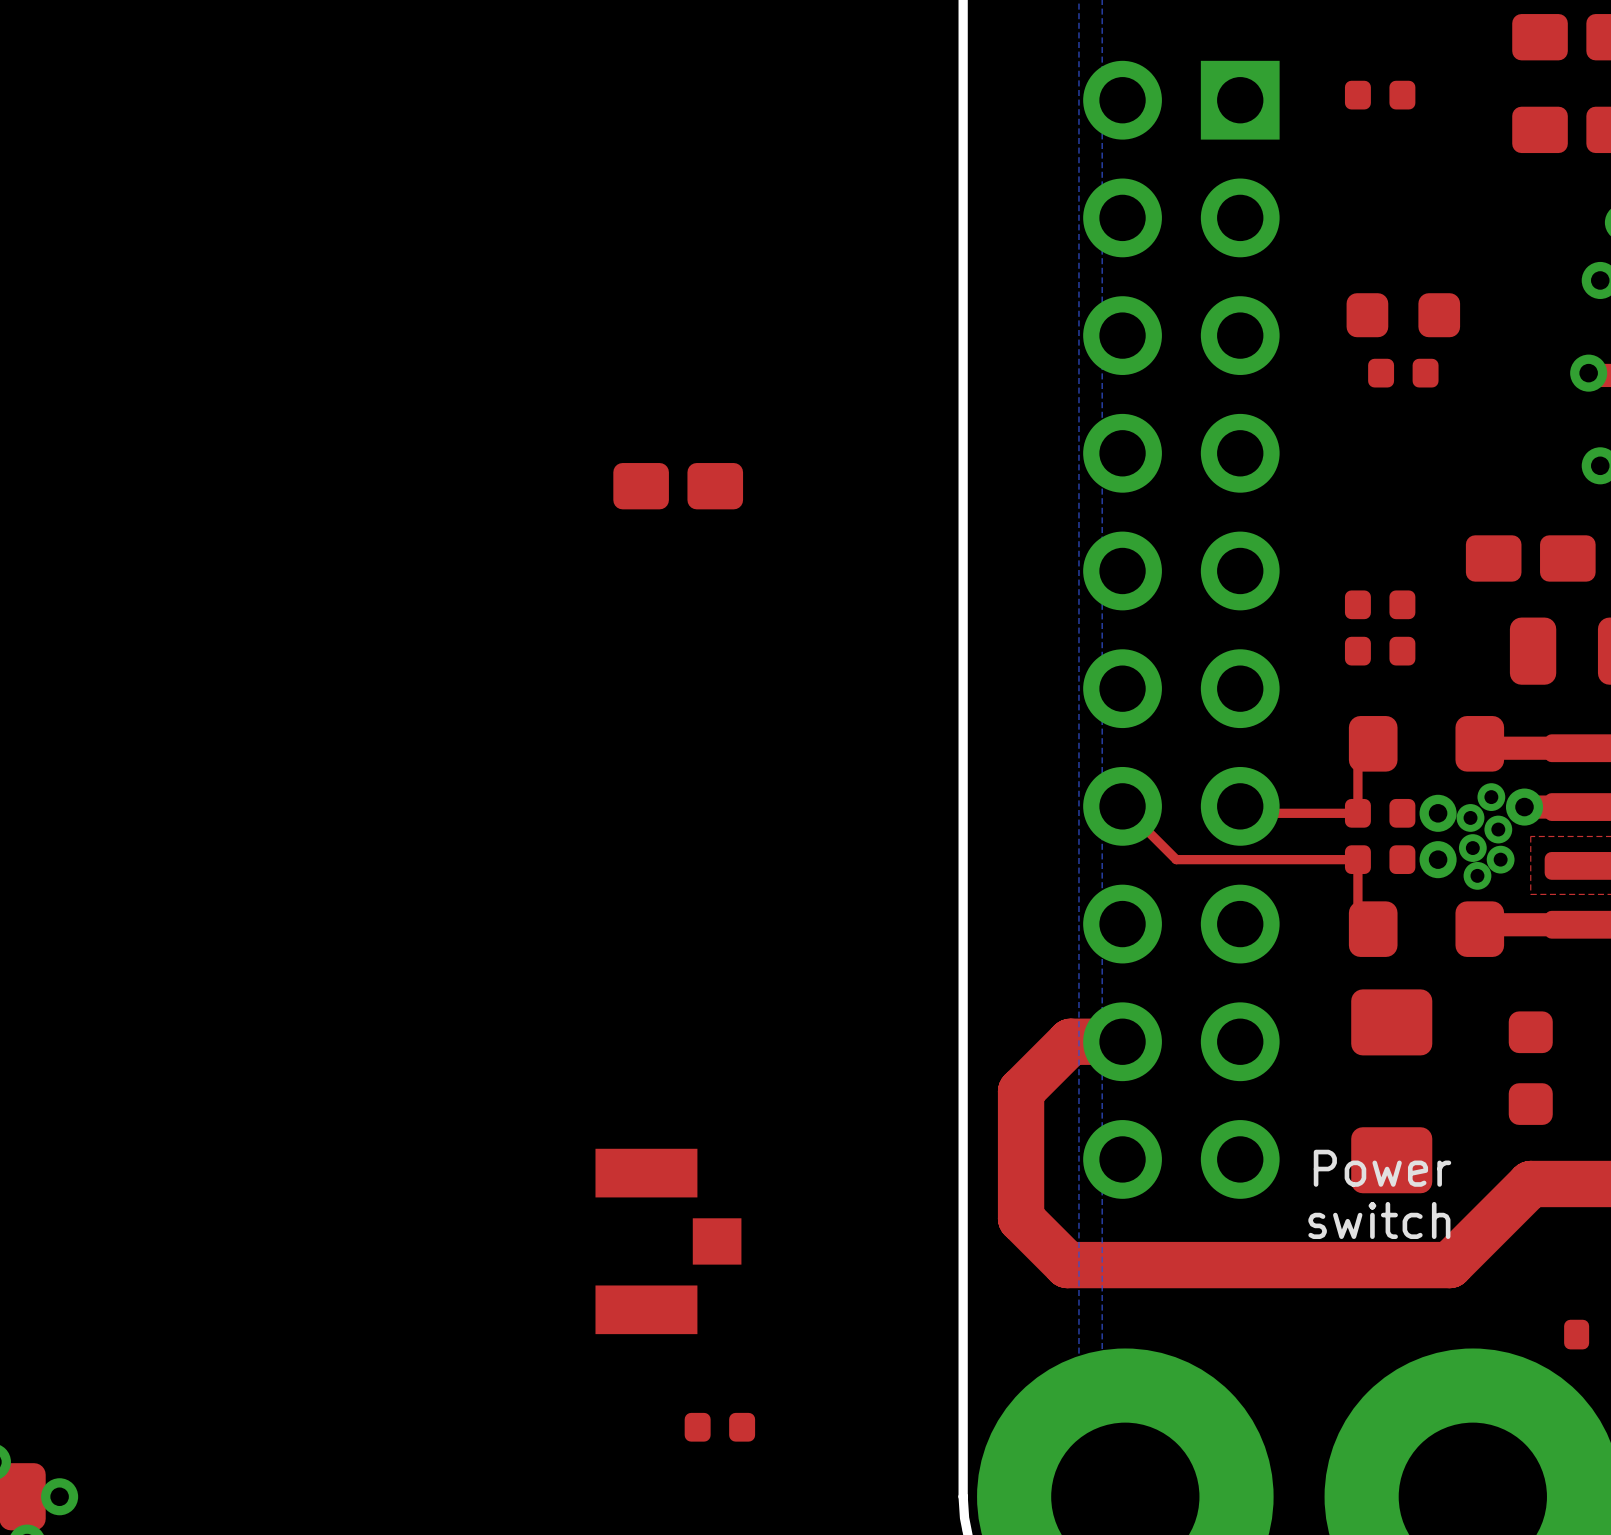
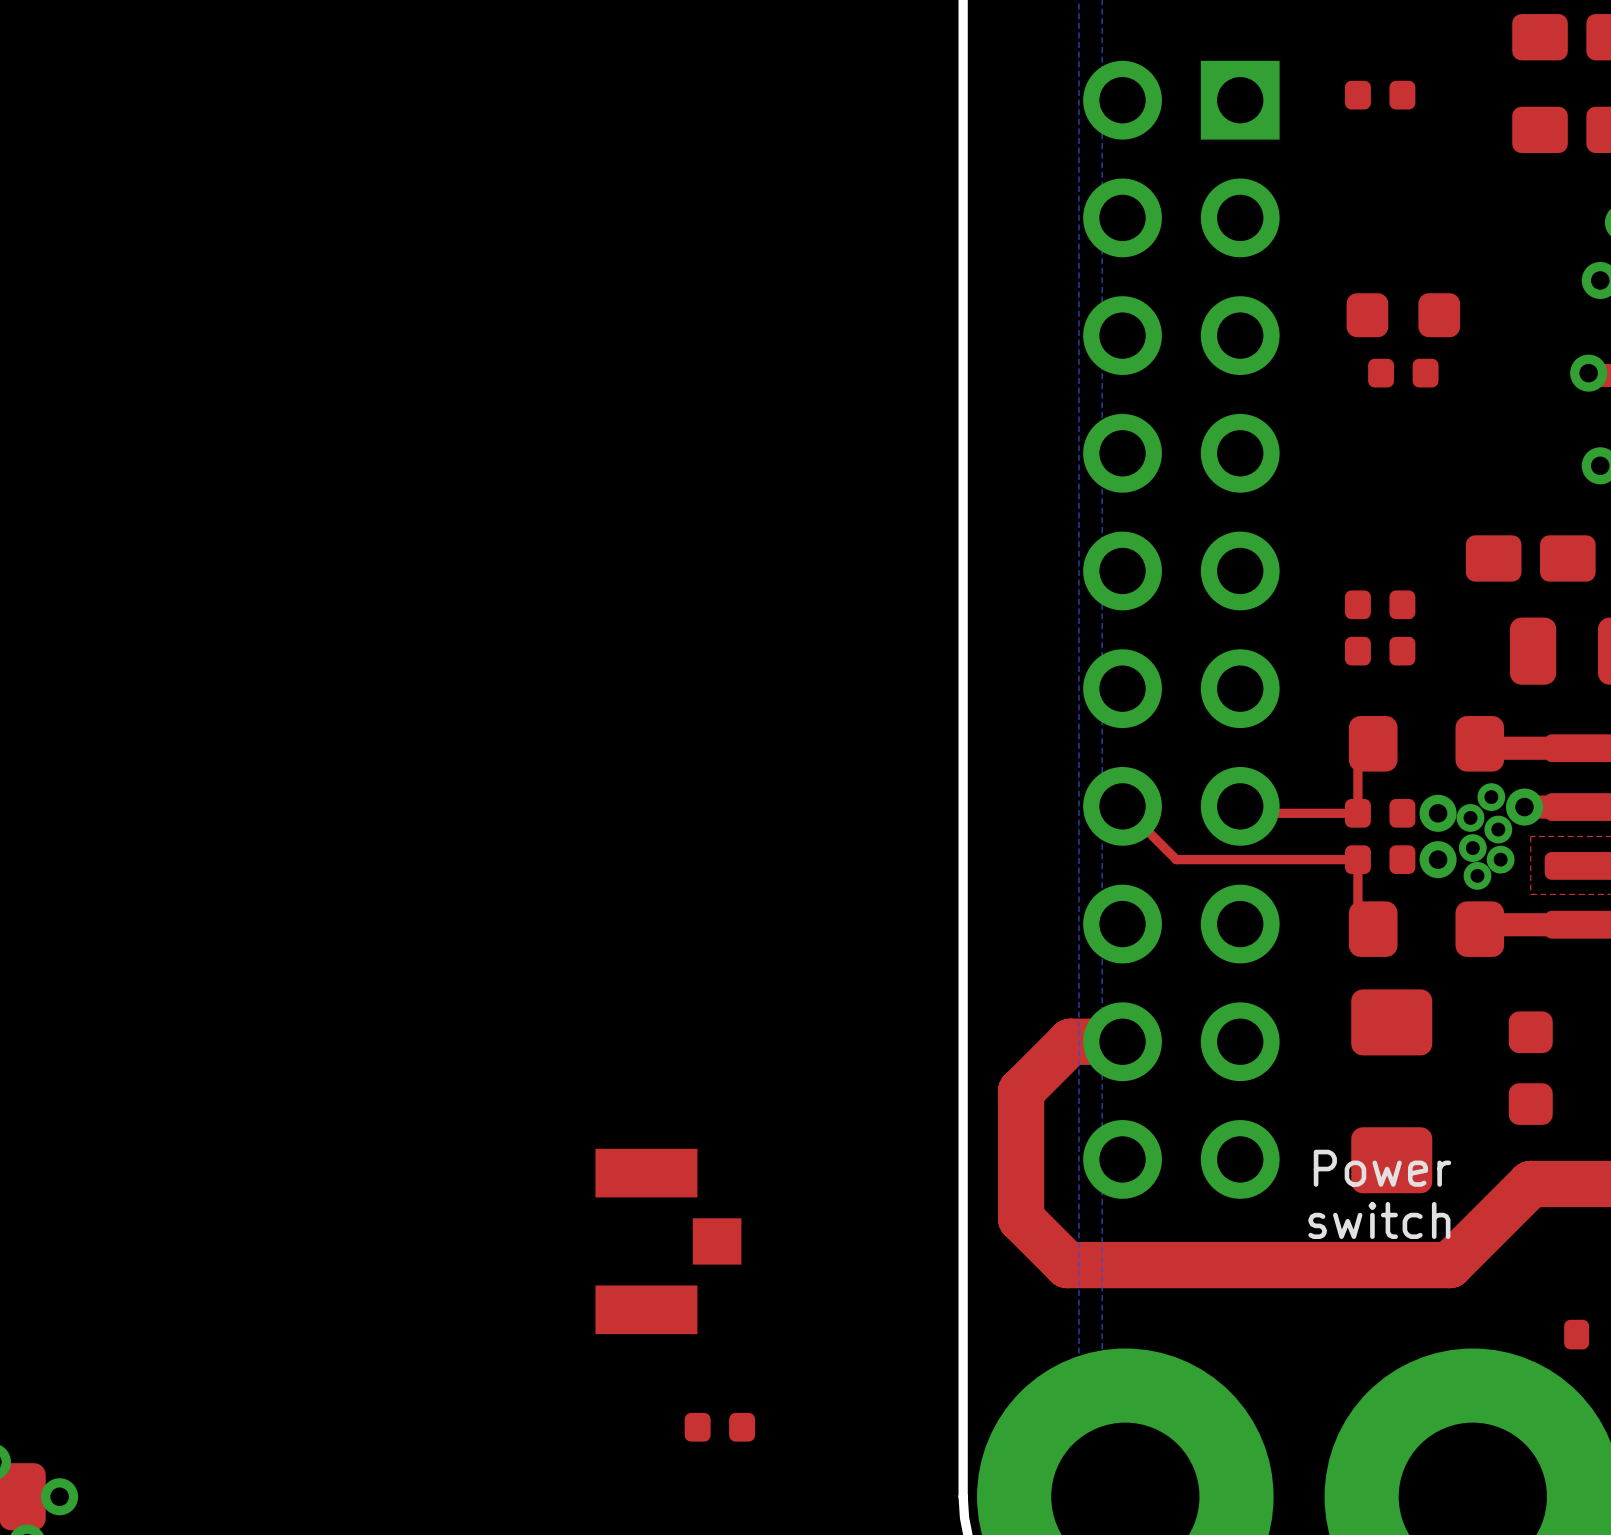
part: (678, 486) -> none

